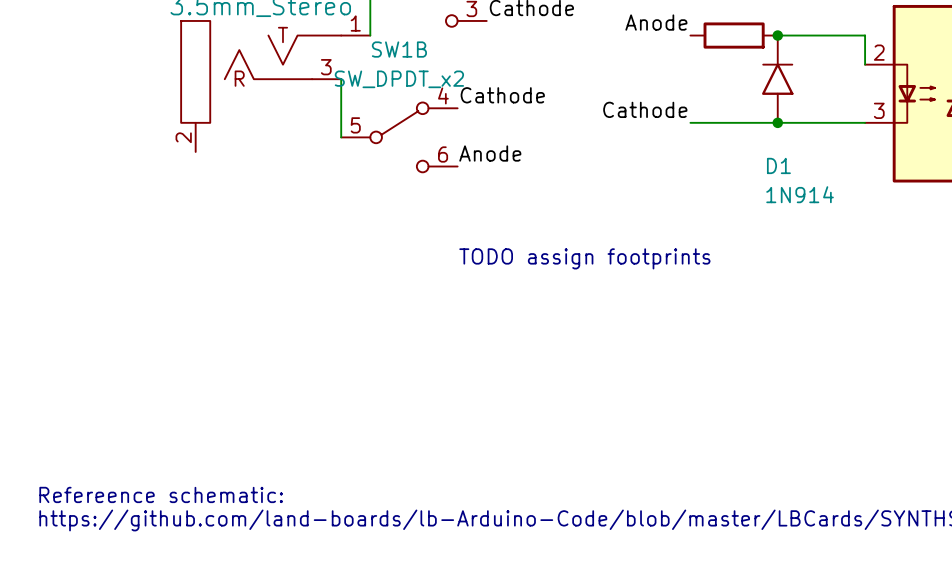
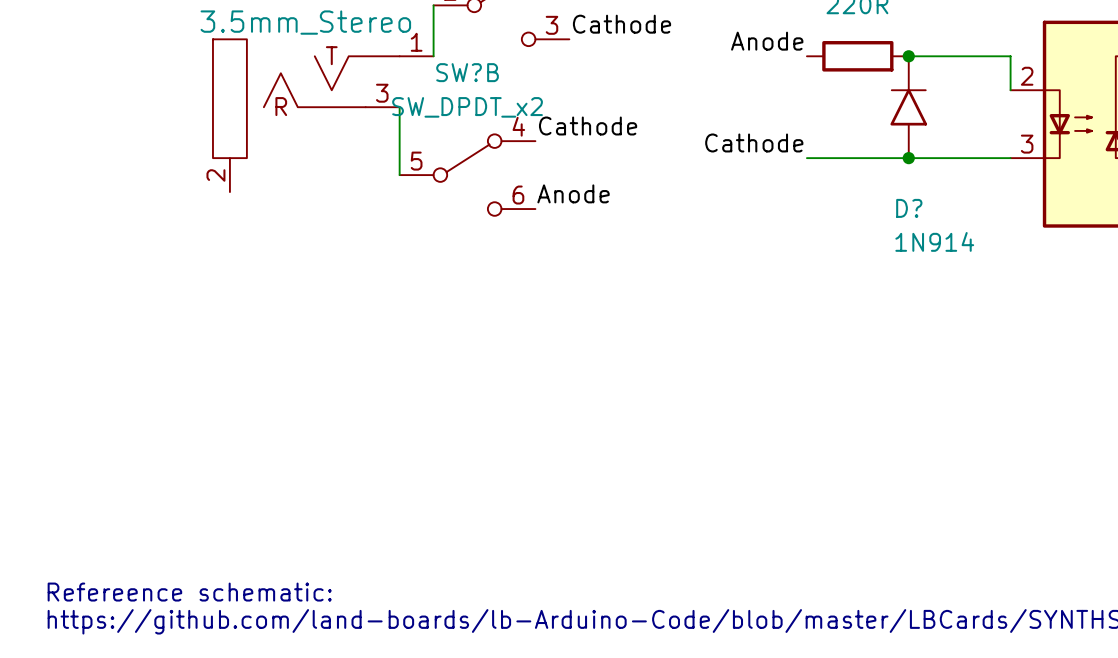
SW1B name: SW1B (399, 49) -> SW?B (467, 72)
D1 name: D1 (778, 165) -> D? (909, 208)
text: TODO assign footprints (584, 258) -> none

